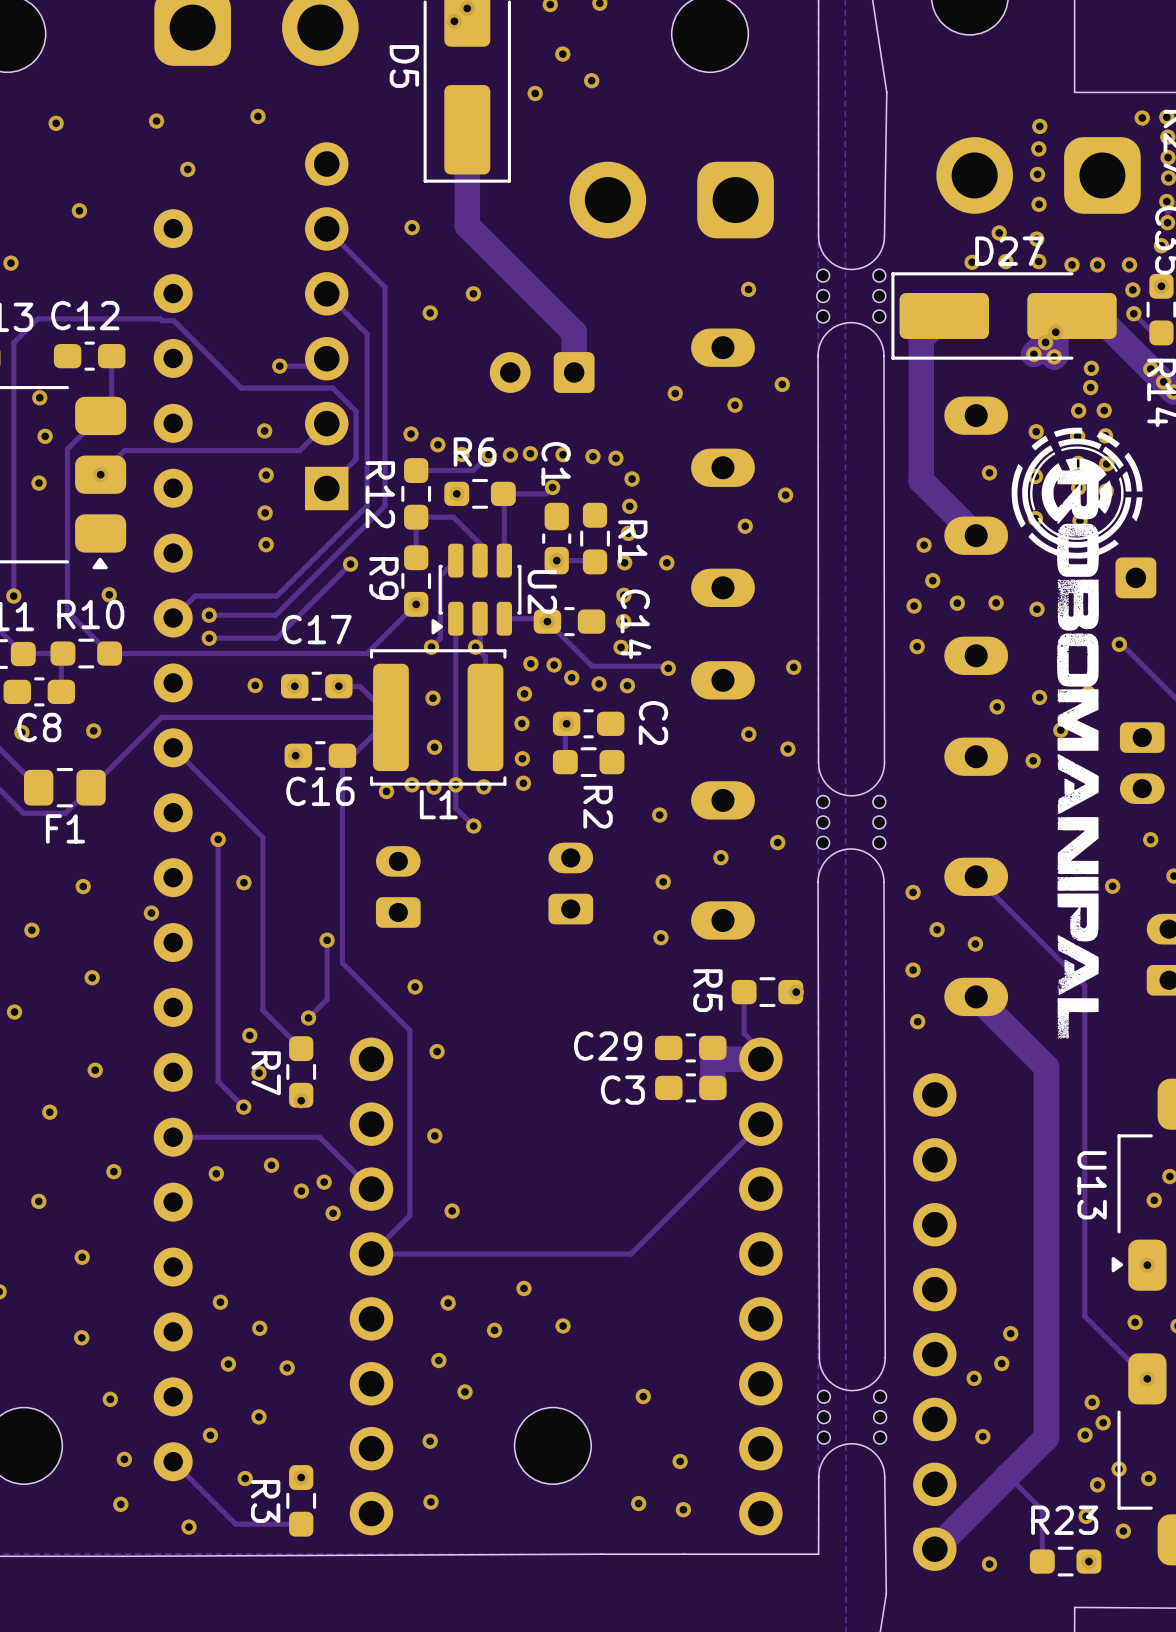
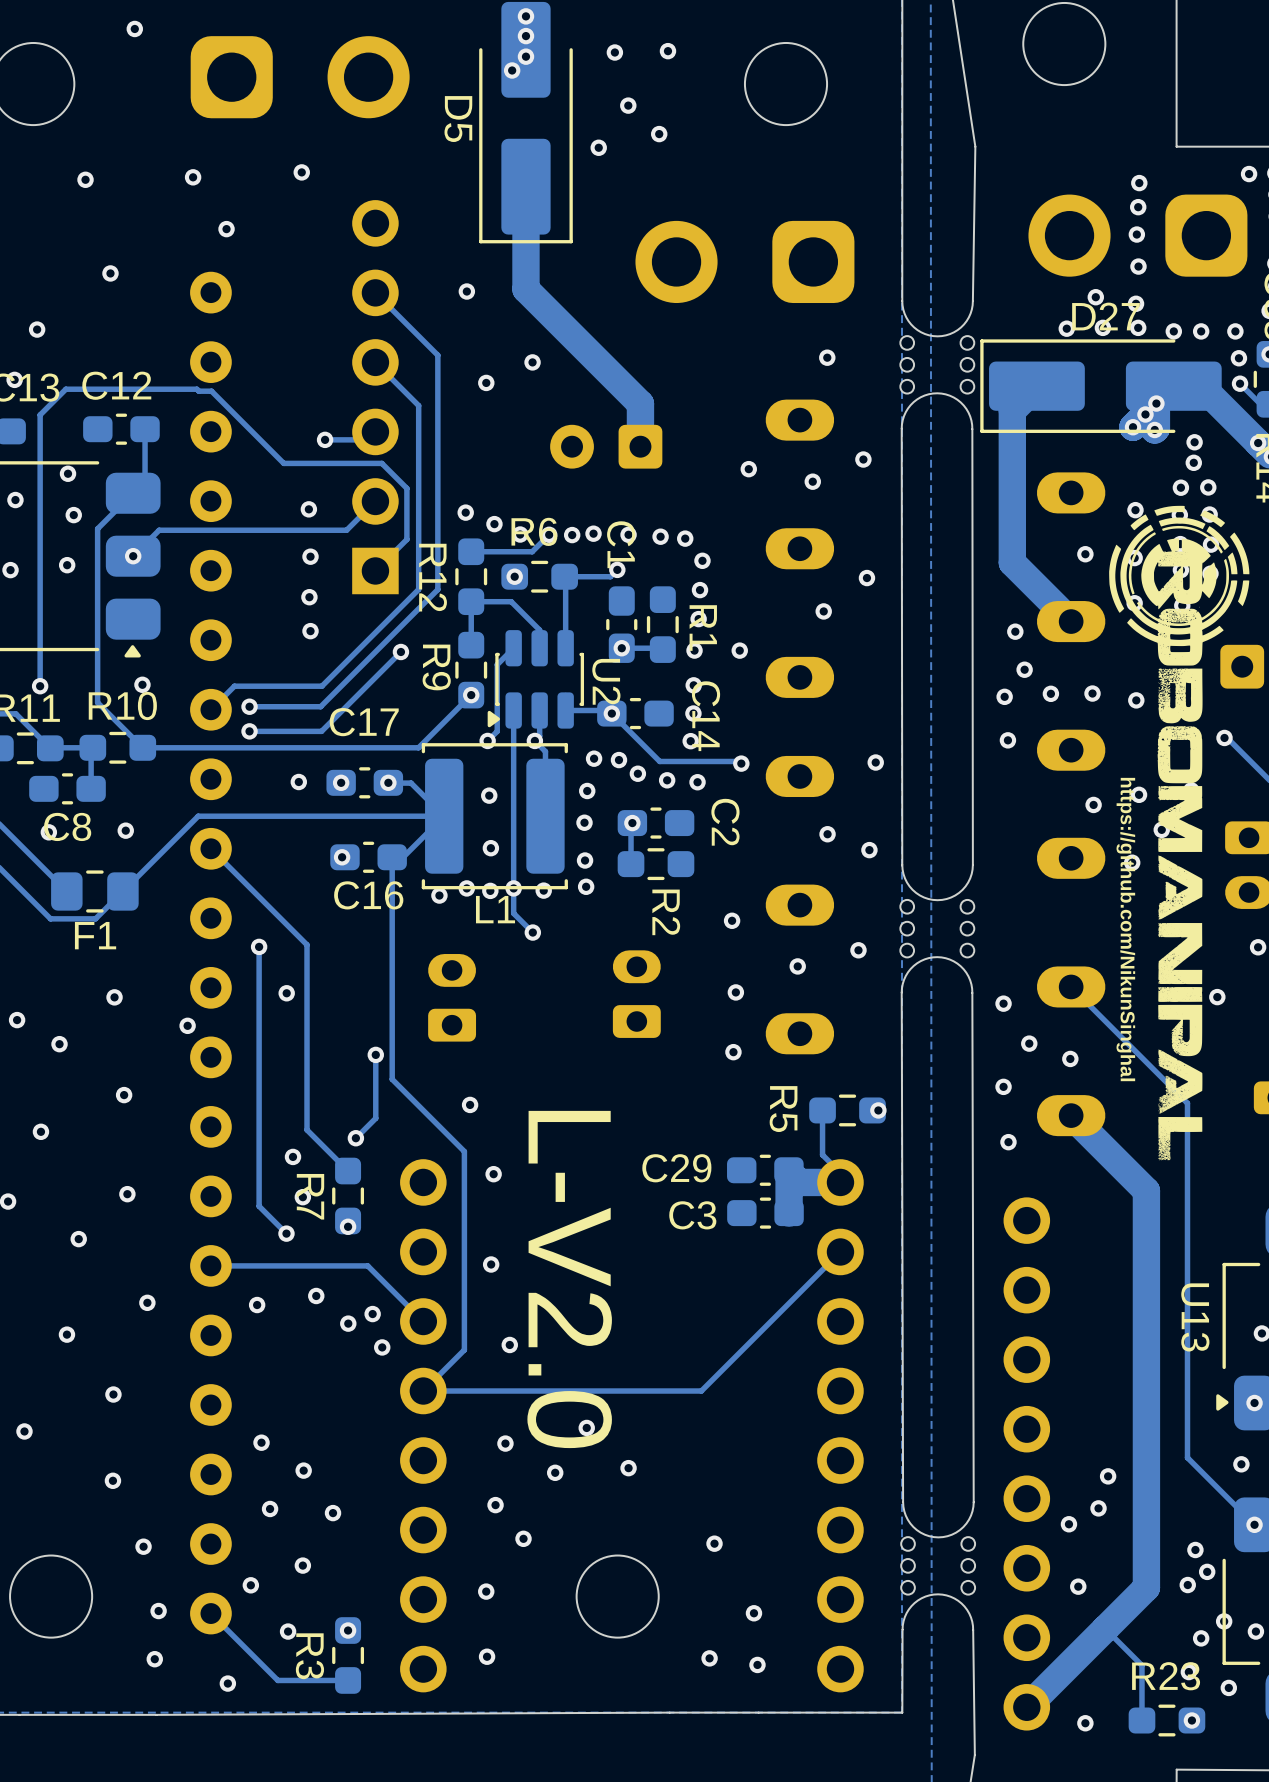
text: none -> https://github.com/NikunSinghal (1125, 929)
text: none -> L-V2.0 (569, 1279)

